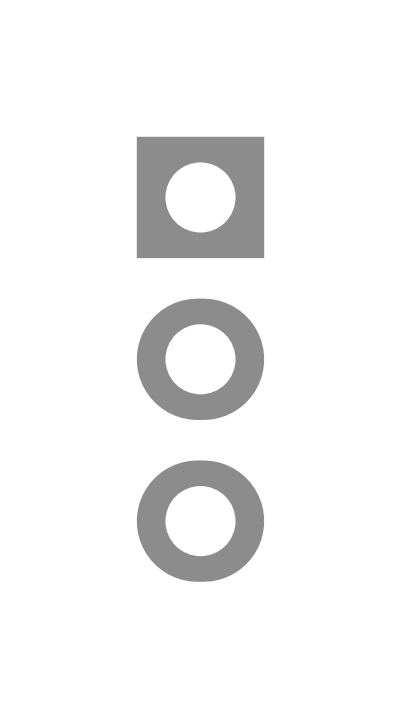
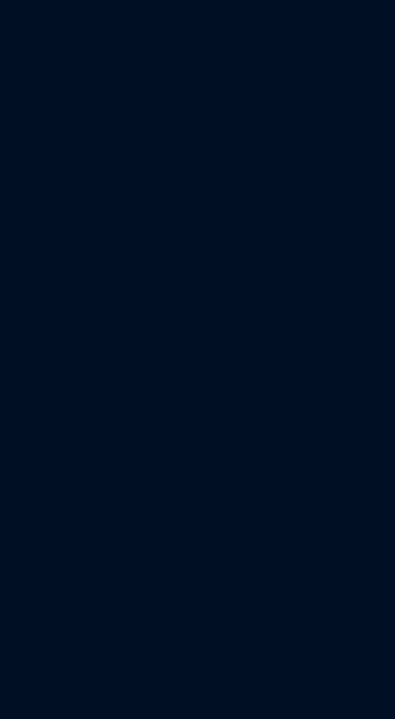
part: (200, 359) -> none

